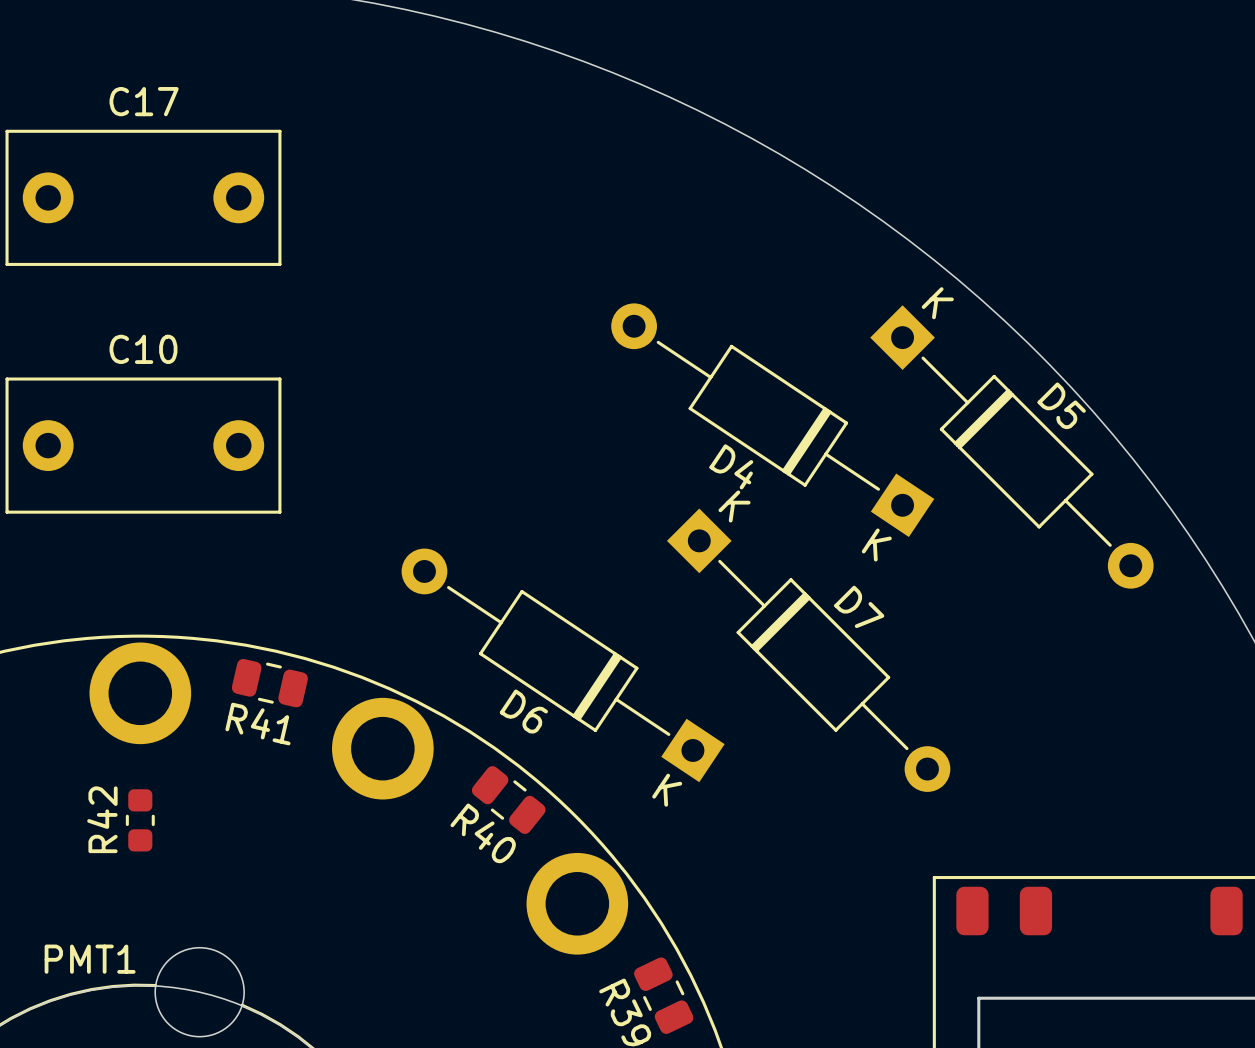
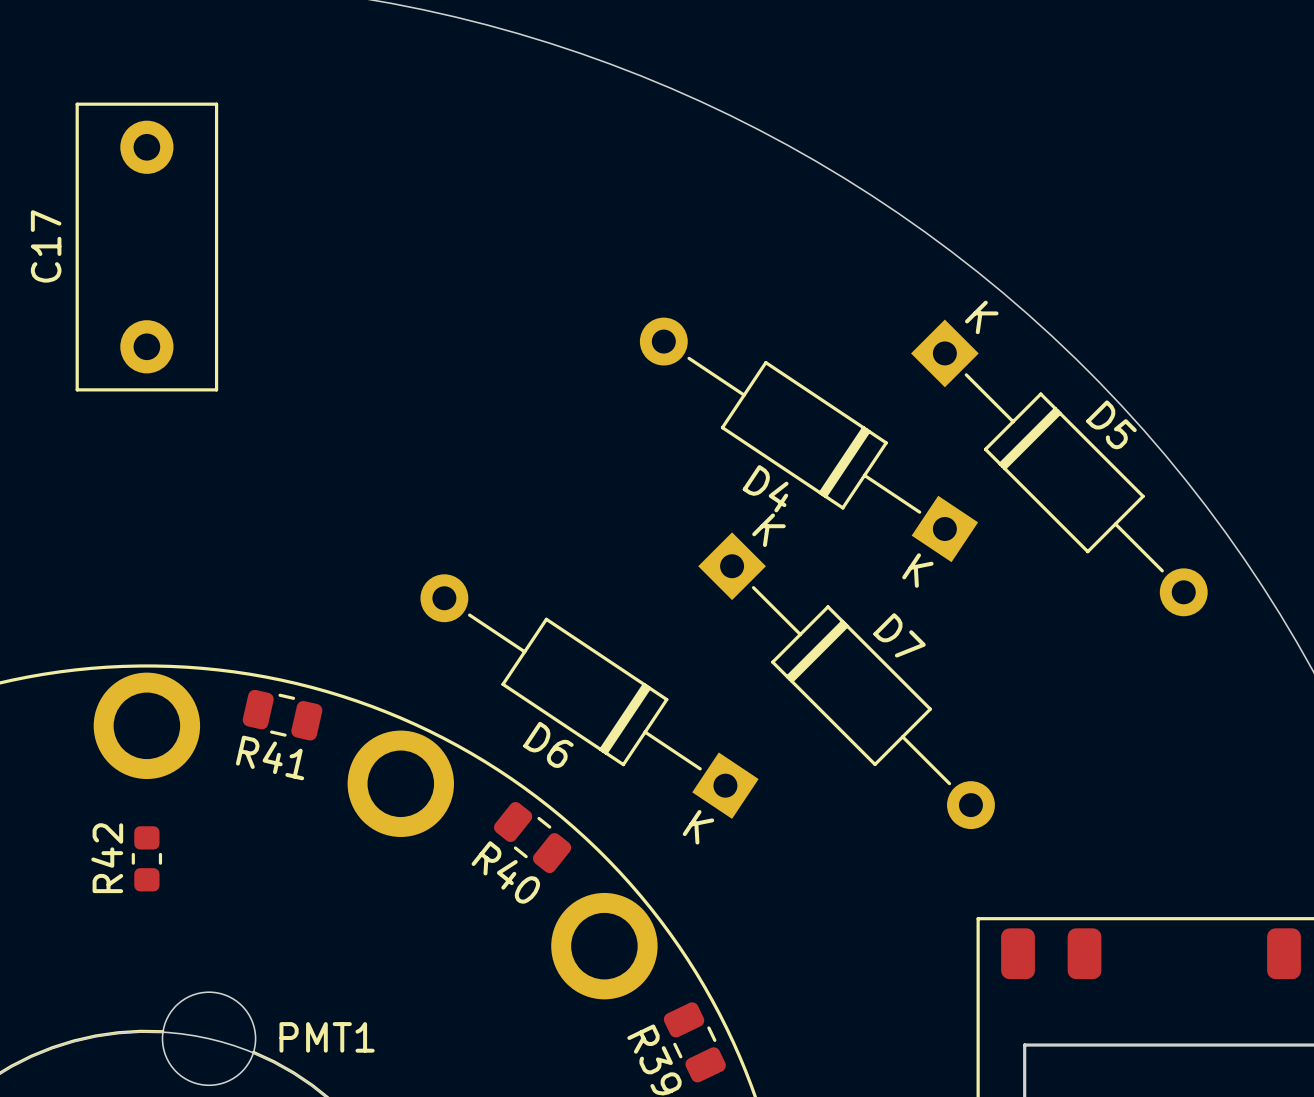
C17 name position: C17 (144, 101) -> C17 (46, 246)
C17 rotation: 0° (143, 197) -> 90° clockwise (146, 247)
C10: (143, 445) -> none
PMT1 name position: PMT1 (90, 959) -> PMT1 (327, 1037)

